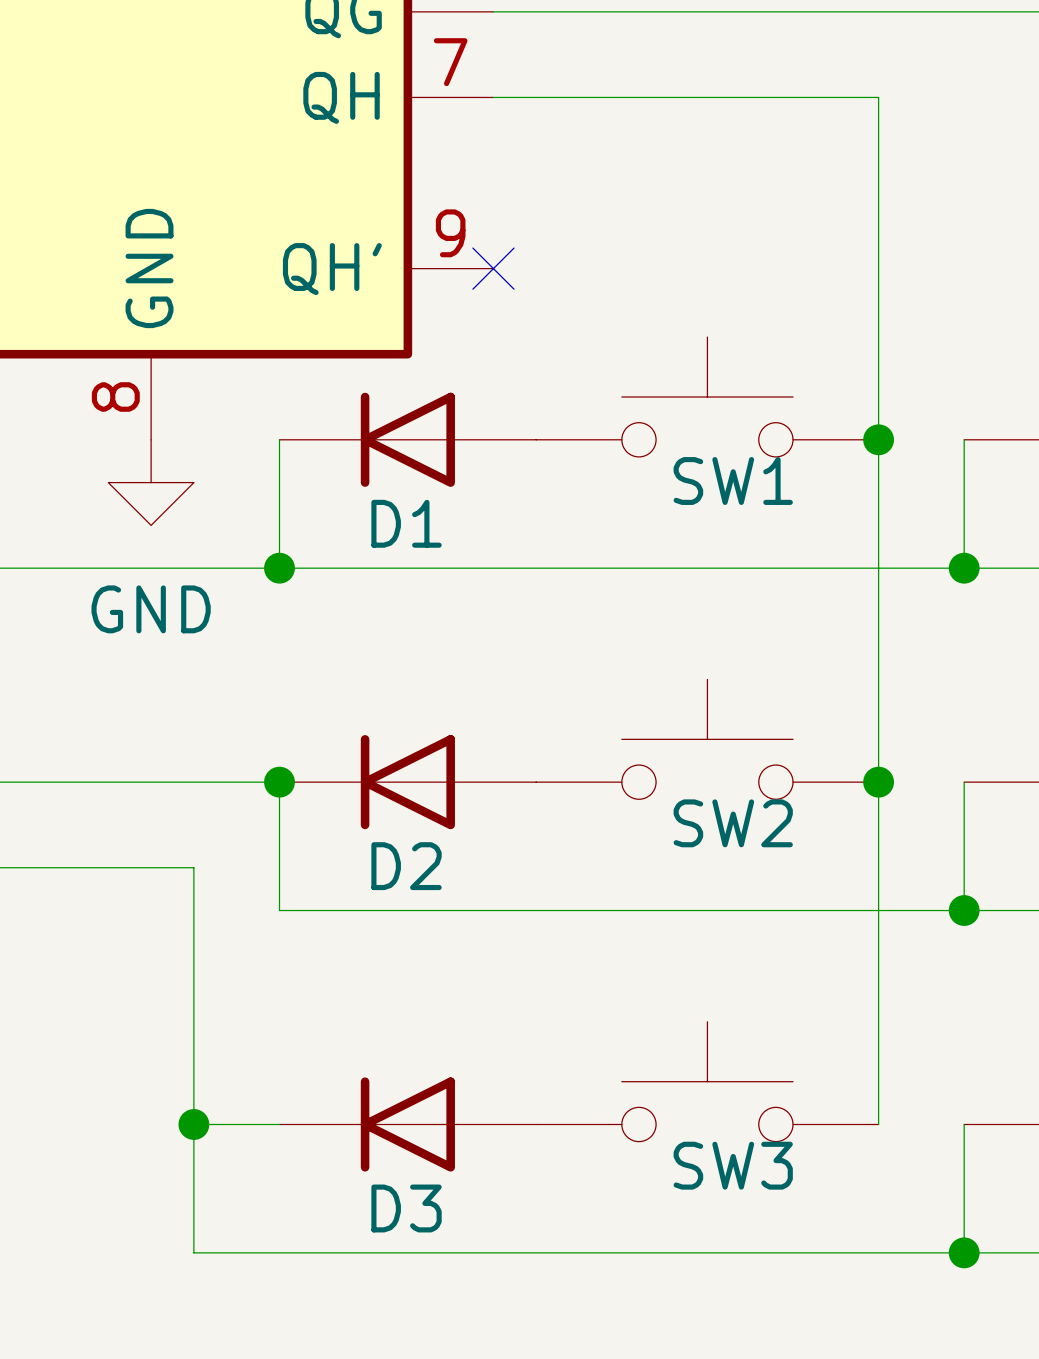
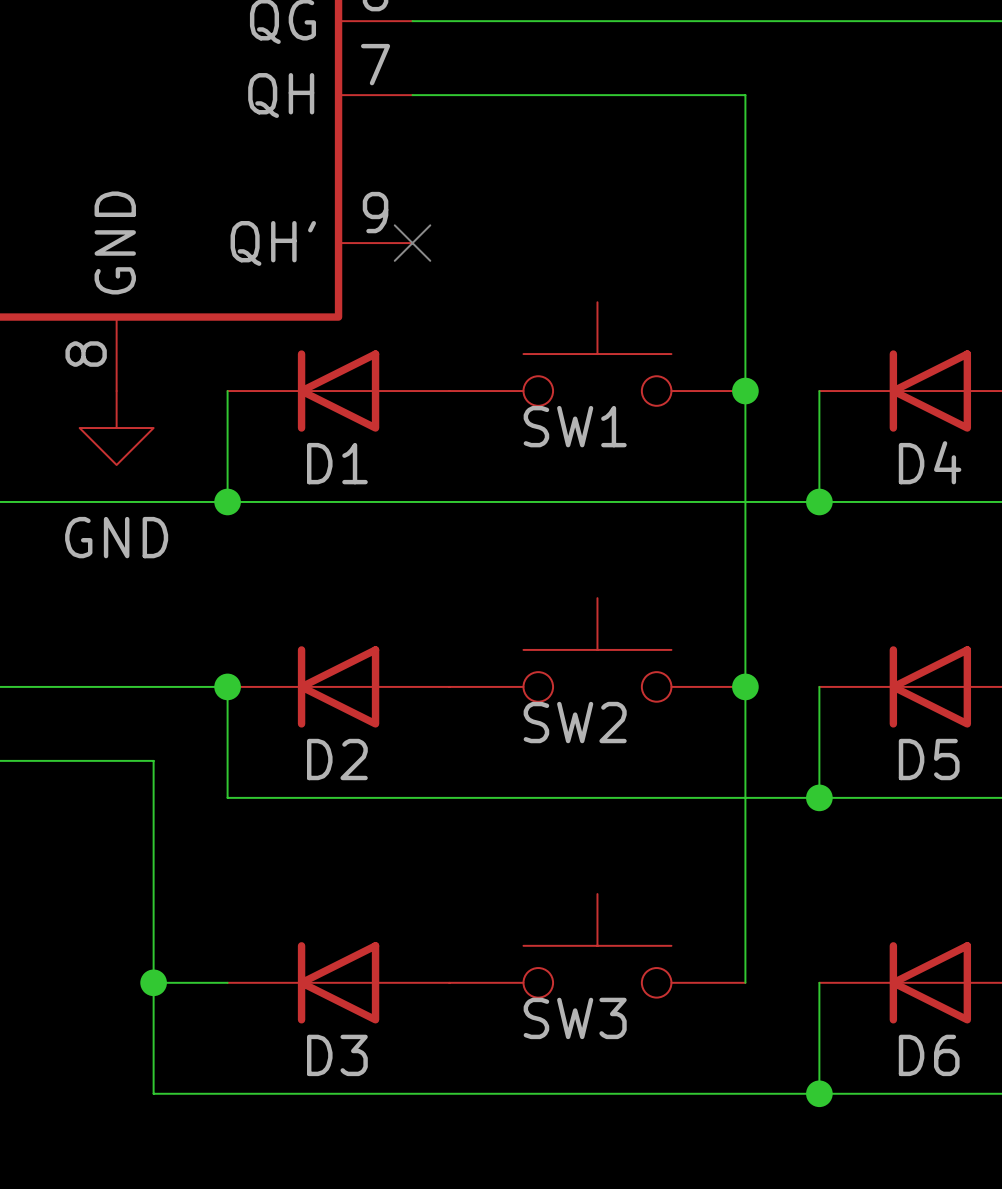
SW1 name position: SW1 (733, 480) -> SW1 (575, 426)
SW2 name position: SW2 (733, 823) -> SW2 (575, 722)
SW3 name position: SW3 (733, 1165) -> SW3 (575, 1018)

